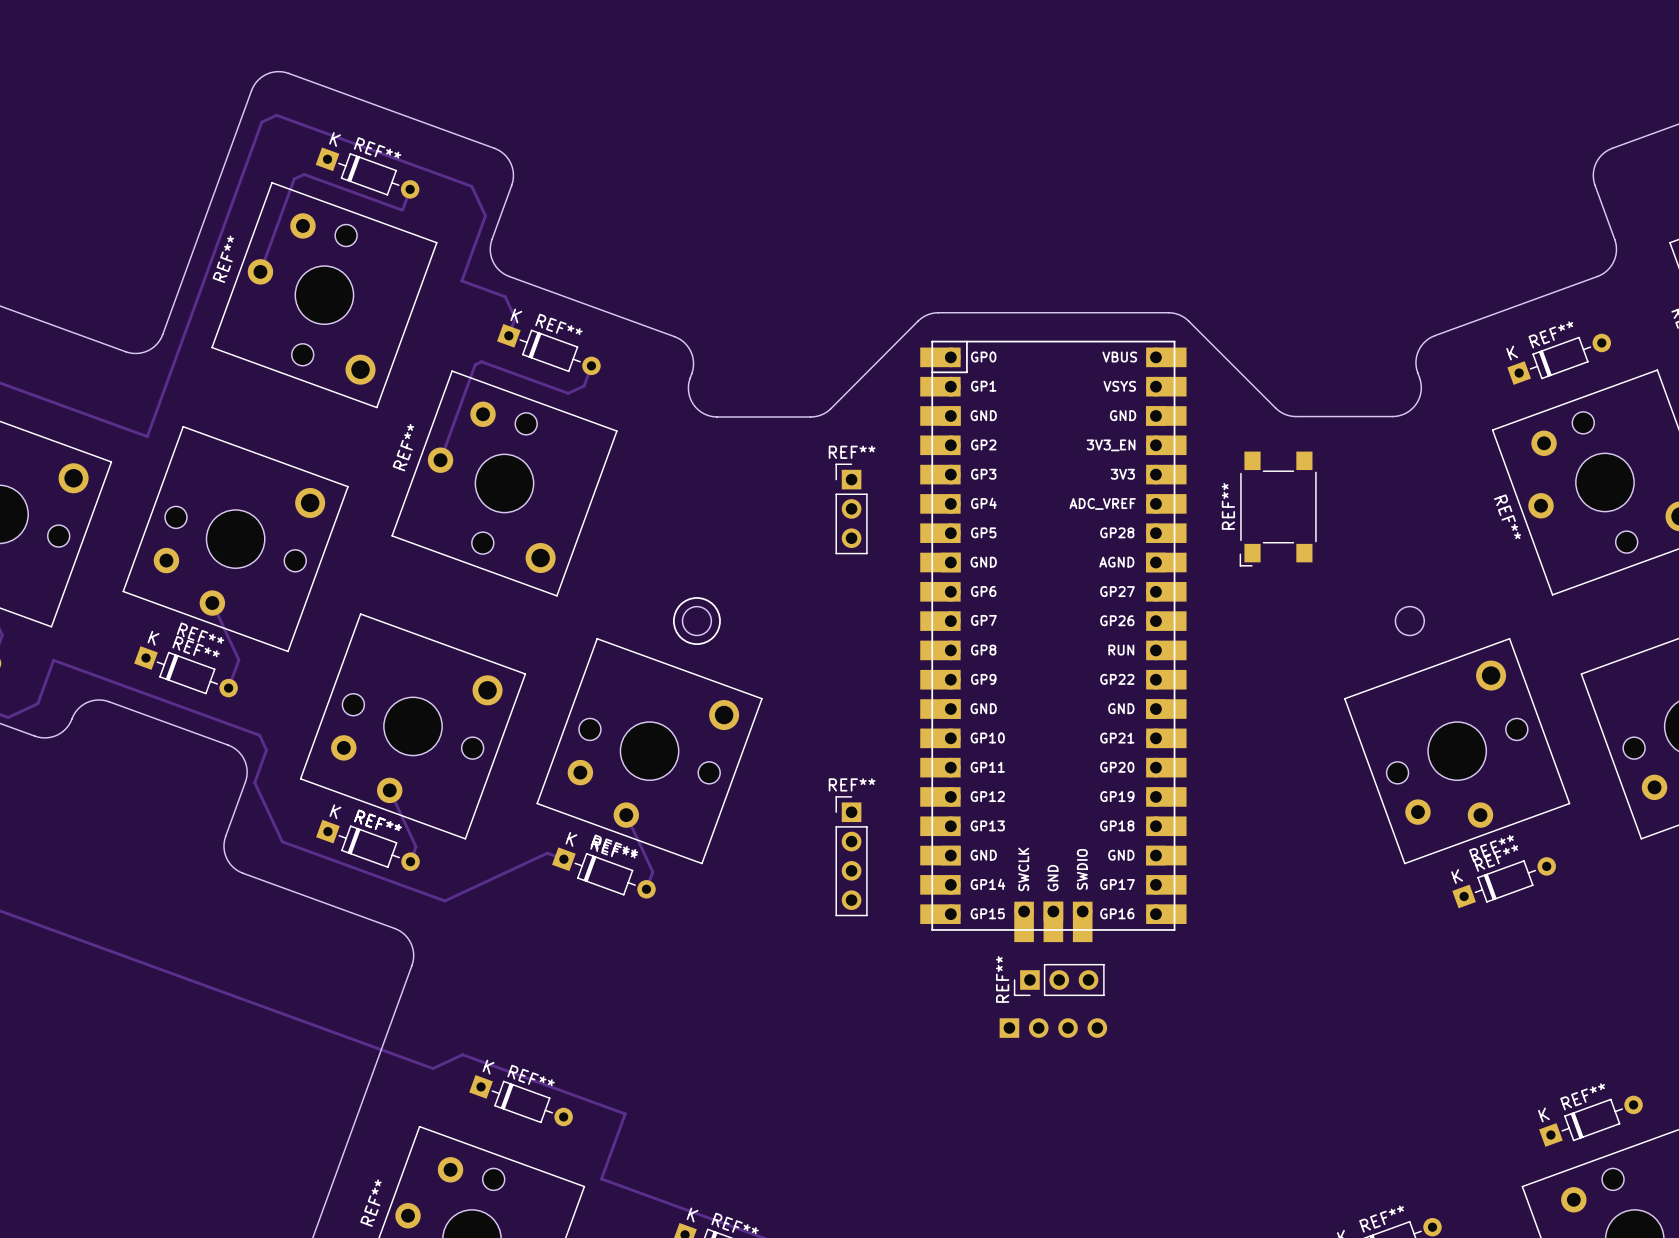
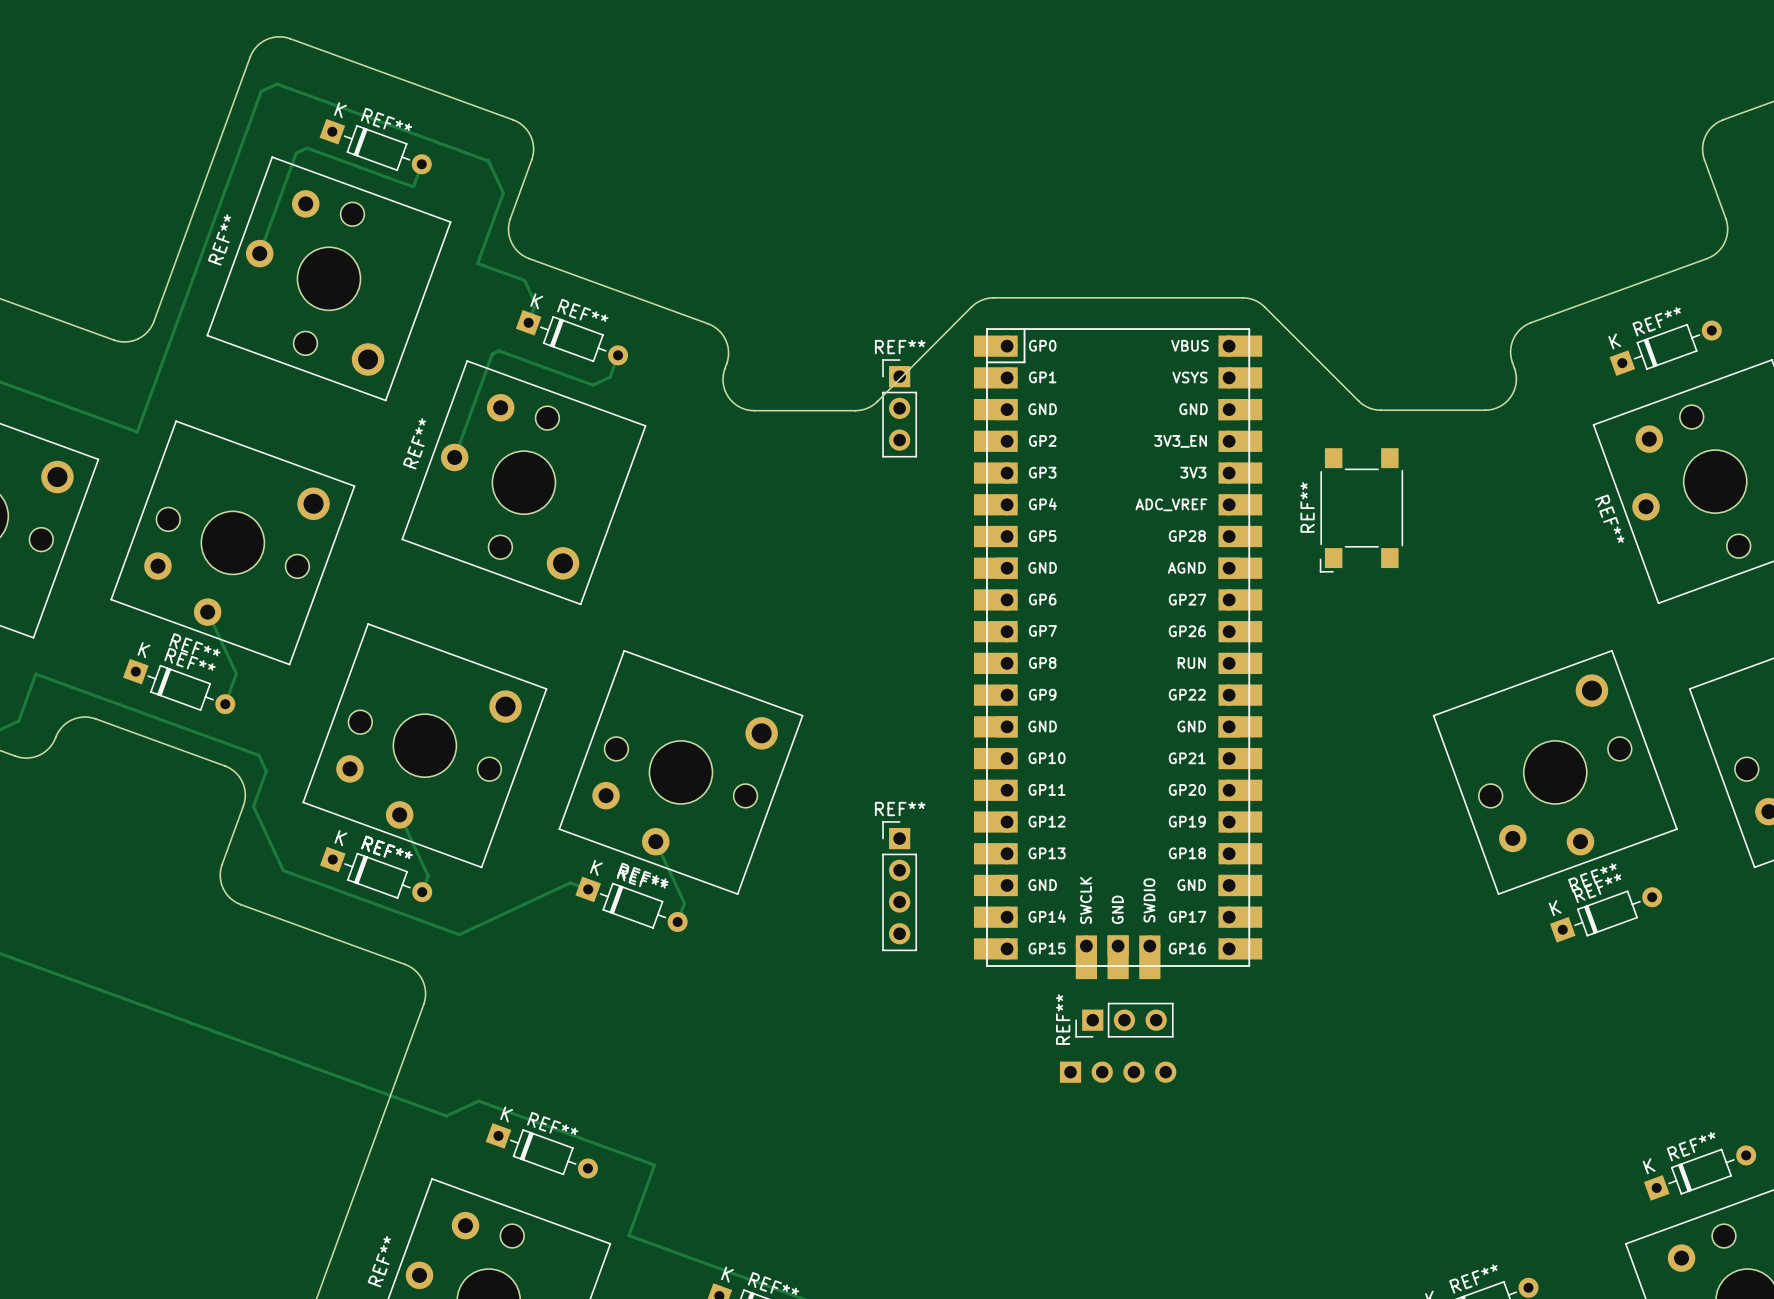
REF** position: (851, 508) -> (899, 408)
drawing: [672, 597, 721, 645] -> none
round board edge: [681, 606, 712, 637] -> none
round board edge: [1394, 606, 1425, 637] -> none

